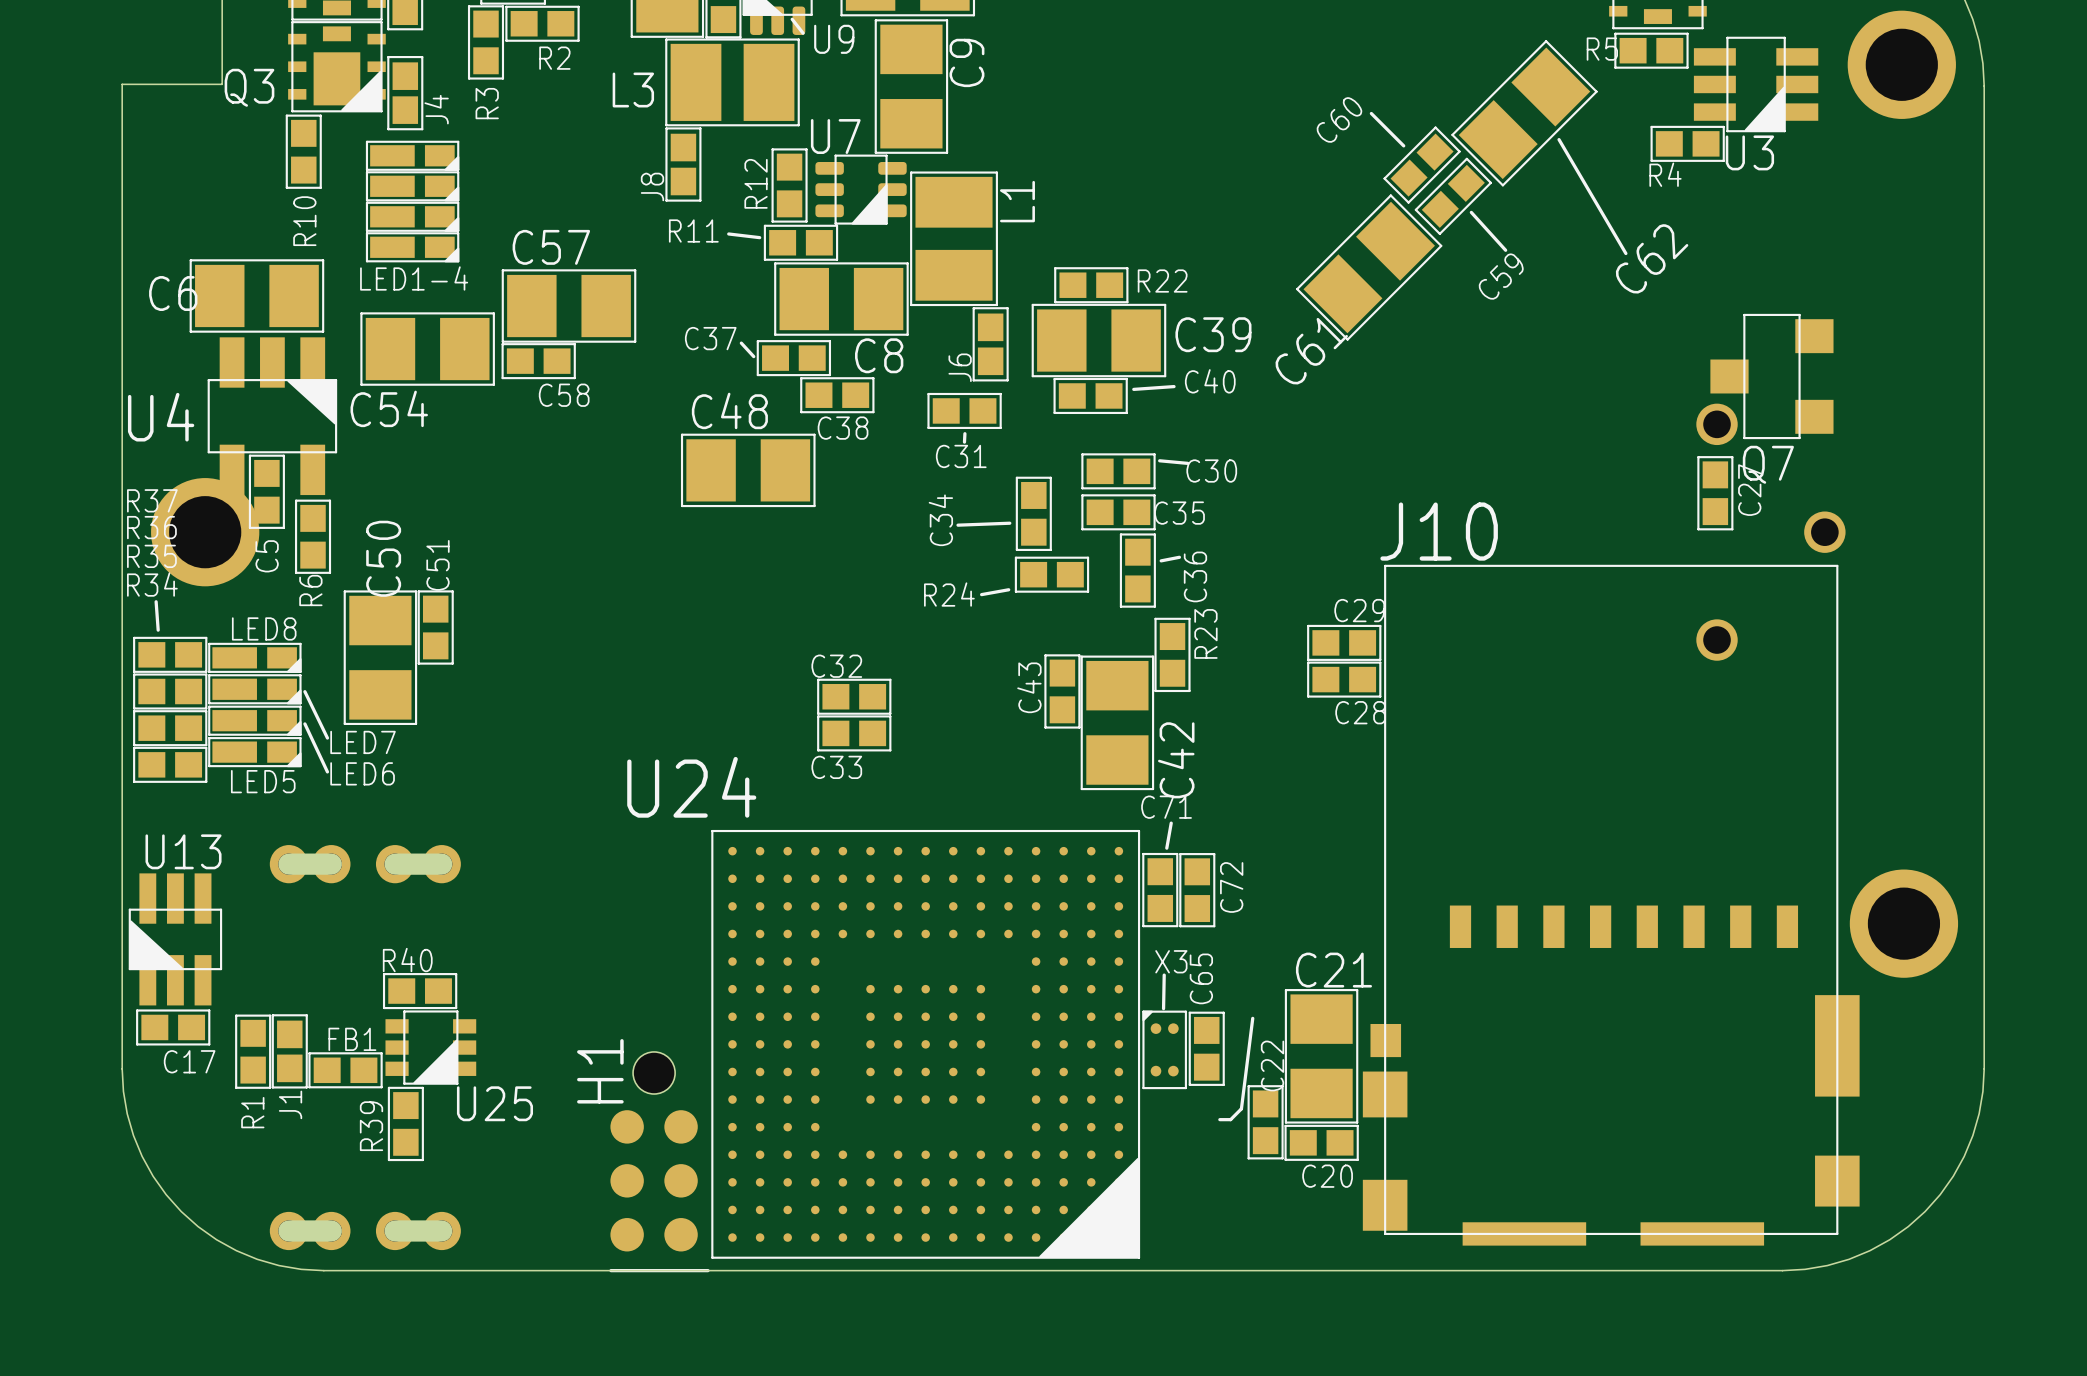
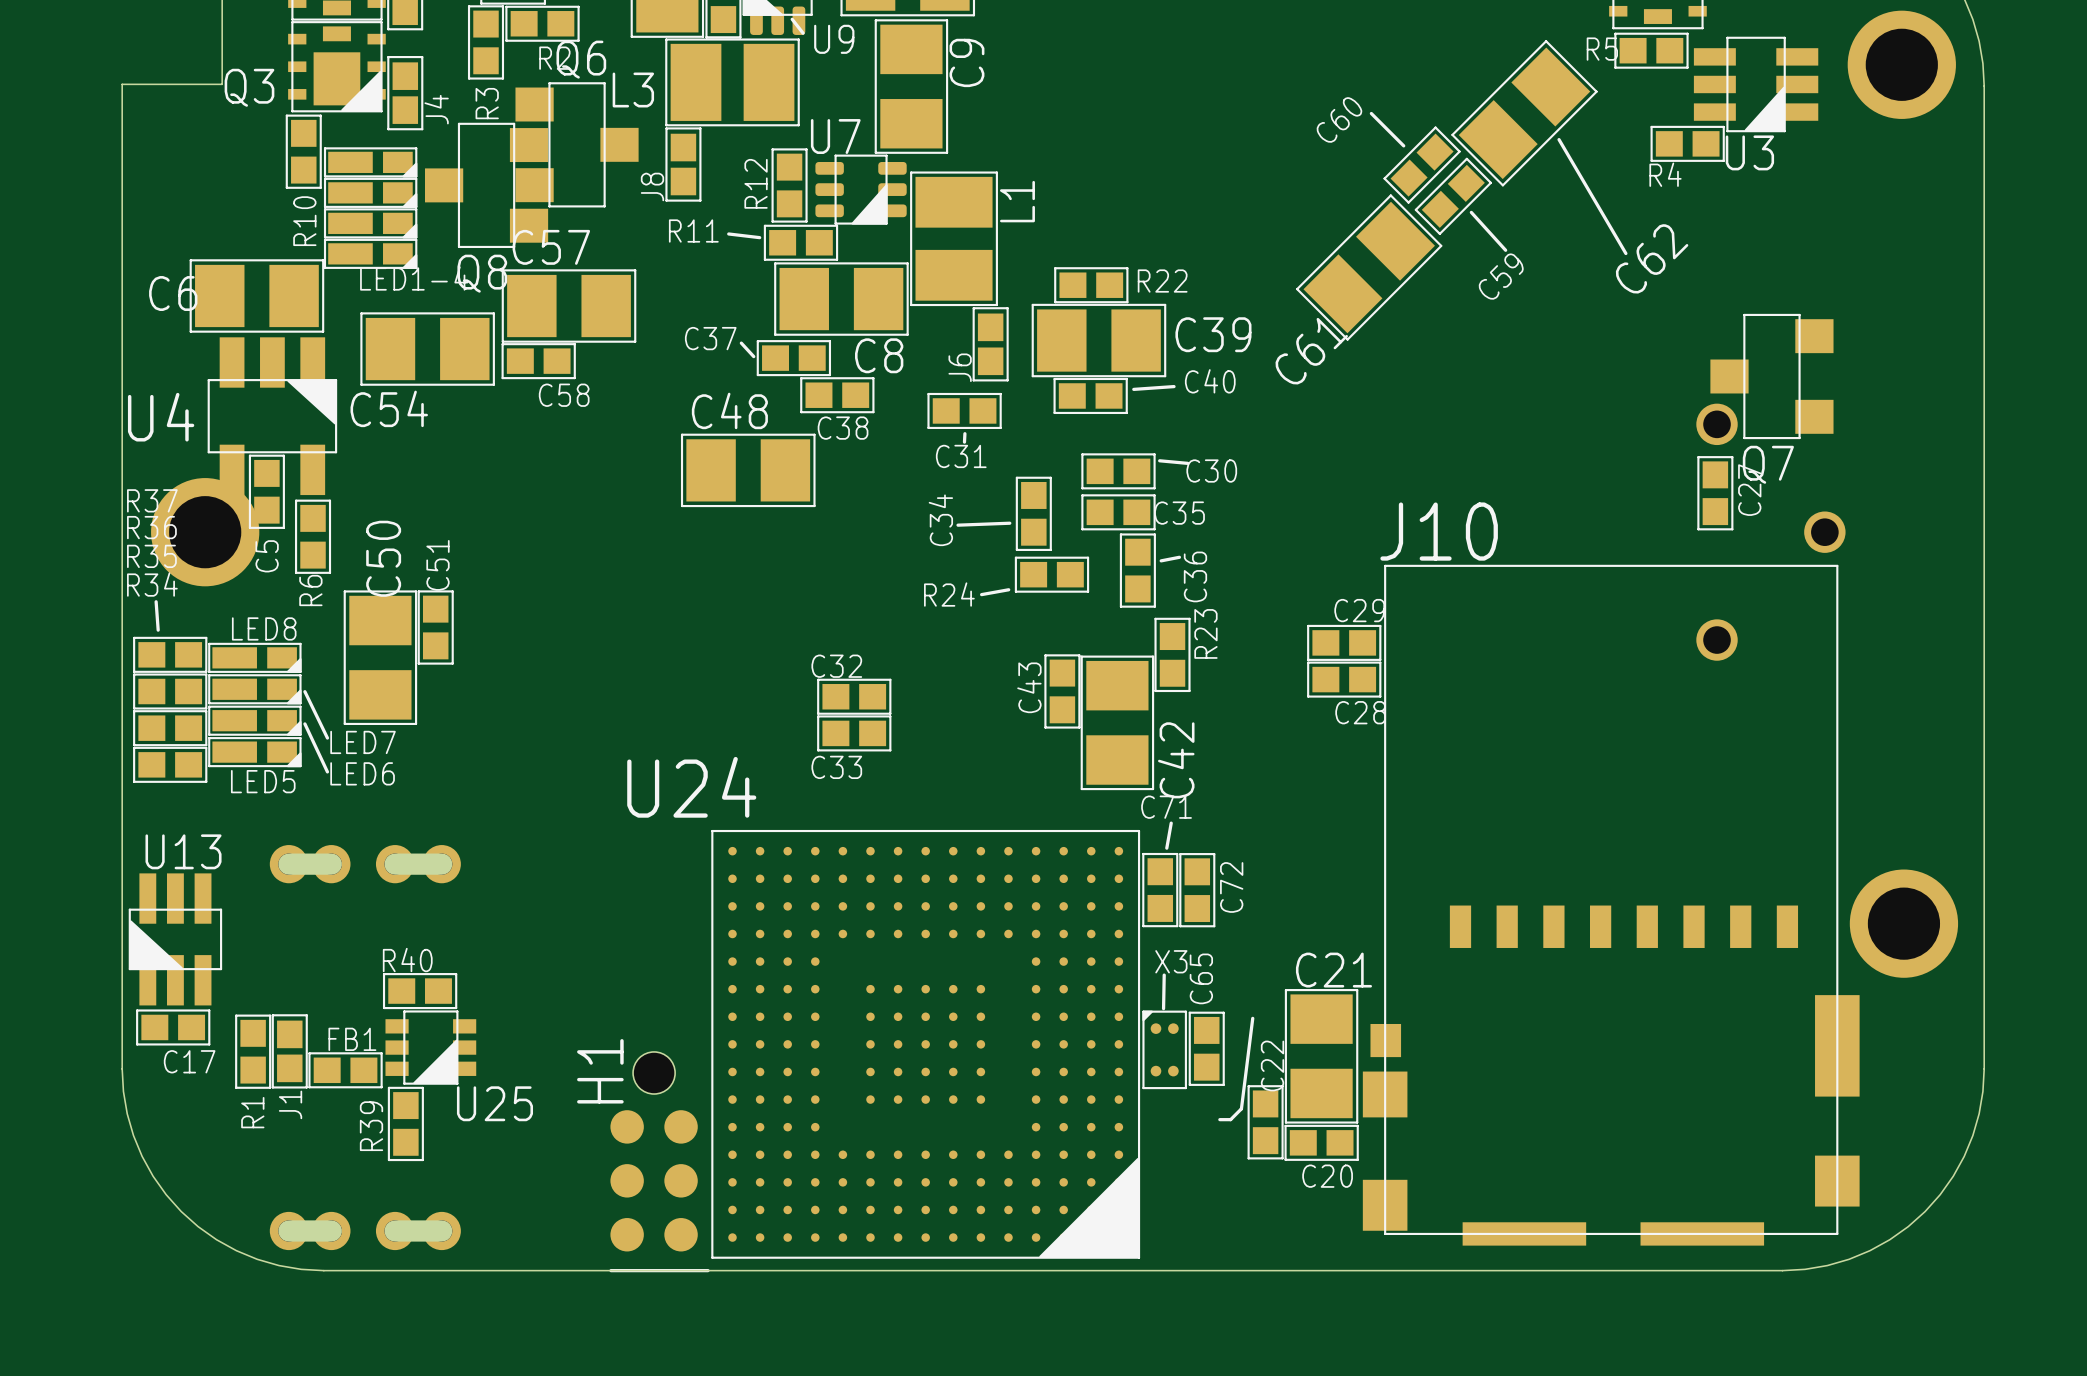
Q6: none -> (577, 144)
part: (412, 155) -> none
part: none -> (370, 162)
Q8: none -> (486, 185)
part: (412, 186) -> none
part: none -> (370, 192)
part: (412, 216) -> none
part: none -> (370, 223)
part: (412, 247) -> none
part: none -> (370, 253)

